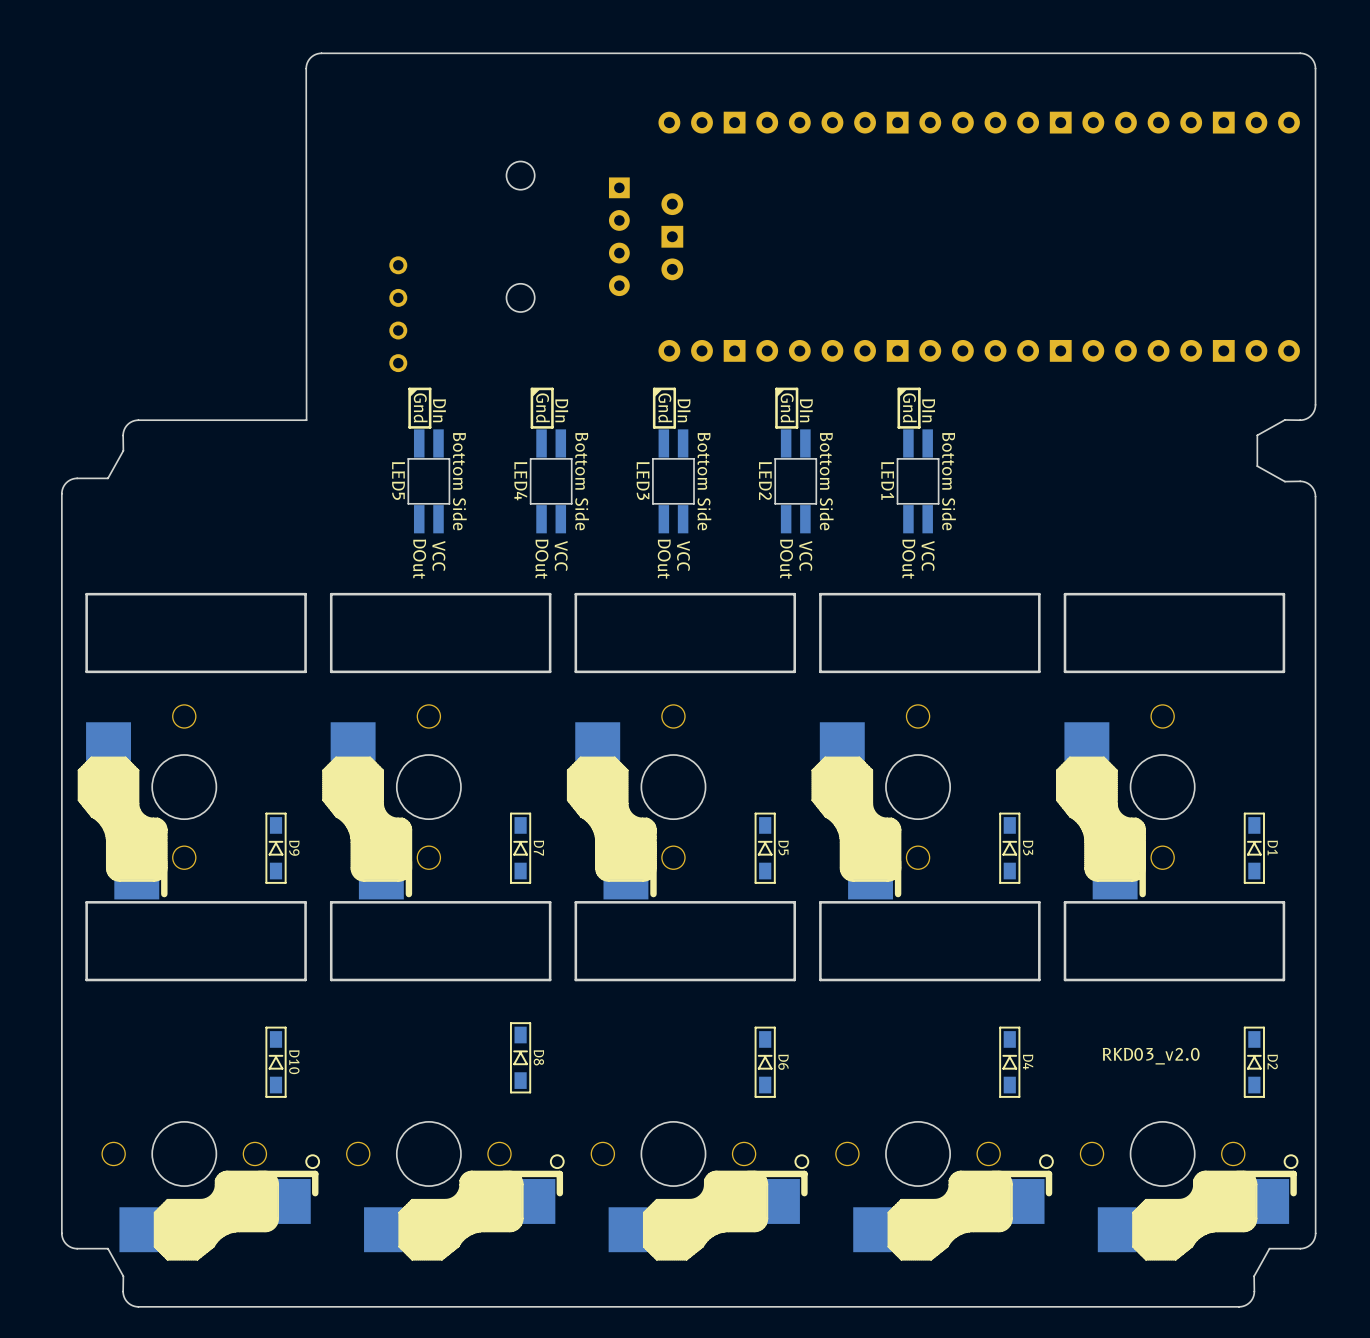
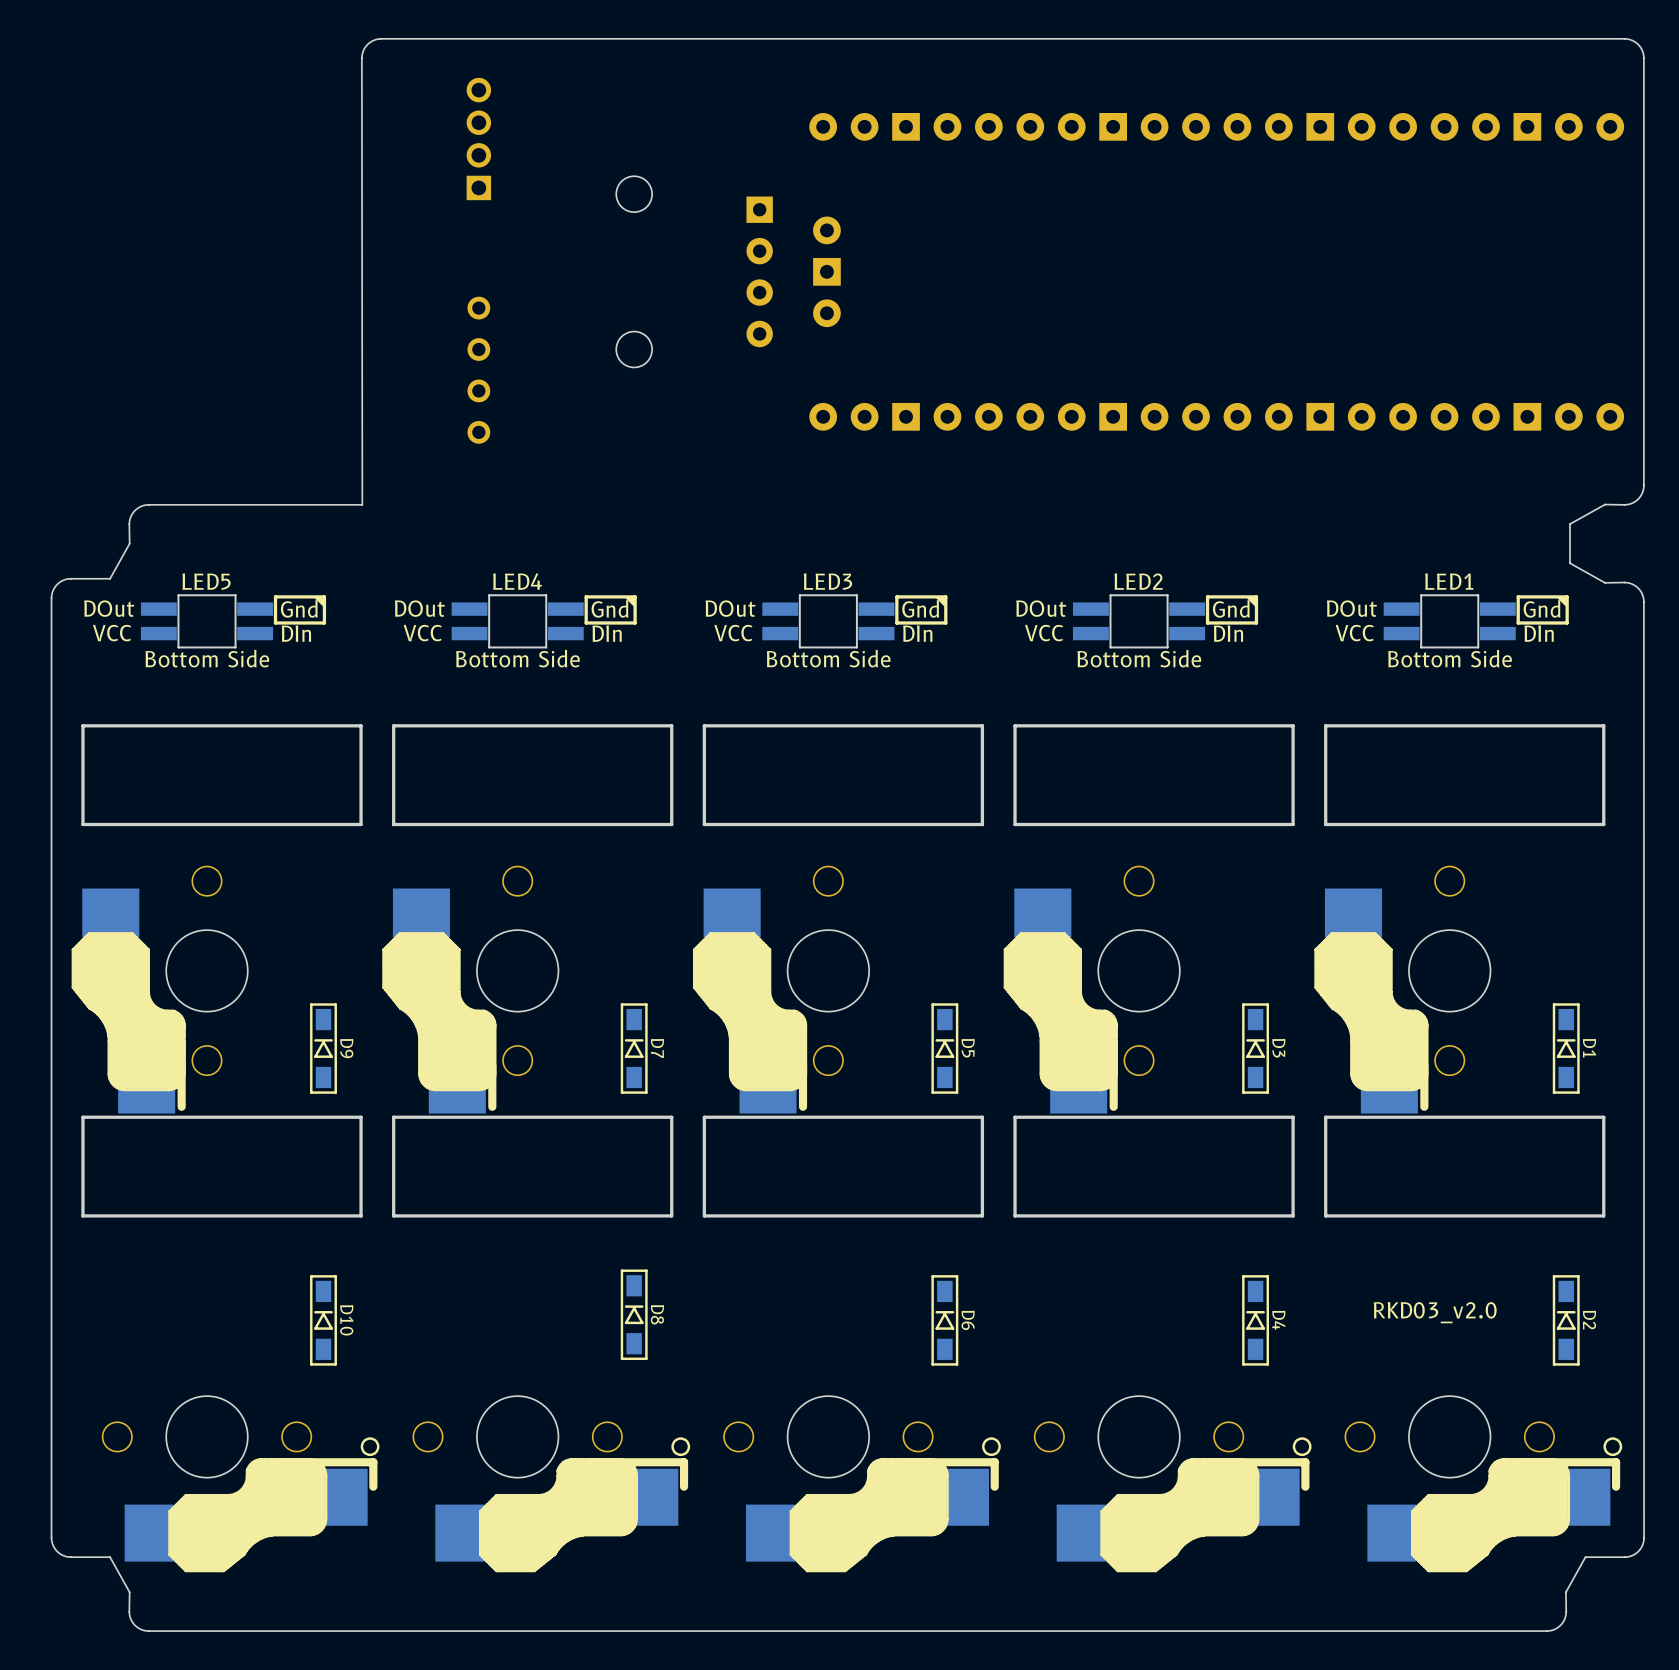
part: none -> (478, 139)
LED5 rotation: 0° (428, 460) -> 90° clockwise (233, 621)
LED5 position: (428, 460) -> (233, 621)
LED4 rotation: 0° (551, 460) -> 90° clockwise (544, 621)
LED4 position: (551, 460) -> (544, 621)
LED3 rotation: 0° (673, 460) -> 90° clockwise (854, 621)
LED2 rotation: 0° (795, 460) -> 90° clockwise (1165, 621)
LED2 position: (795, 460) -> (1165, 621)
LED1 rotation: 0° (918, 460) -> 90° clockwise (1476, 621)
LED1 position: (918, 460) -> (1476, 621)

